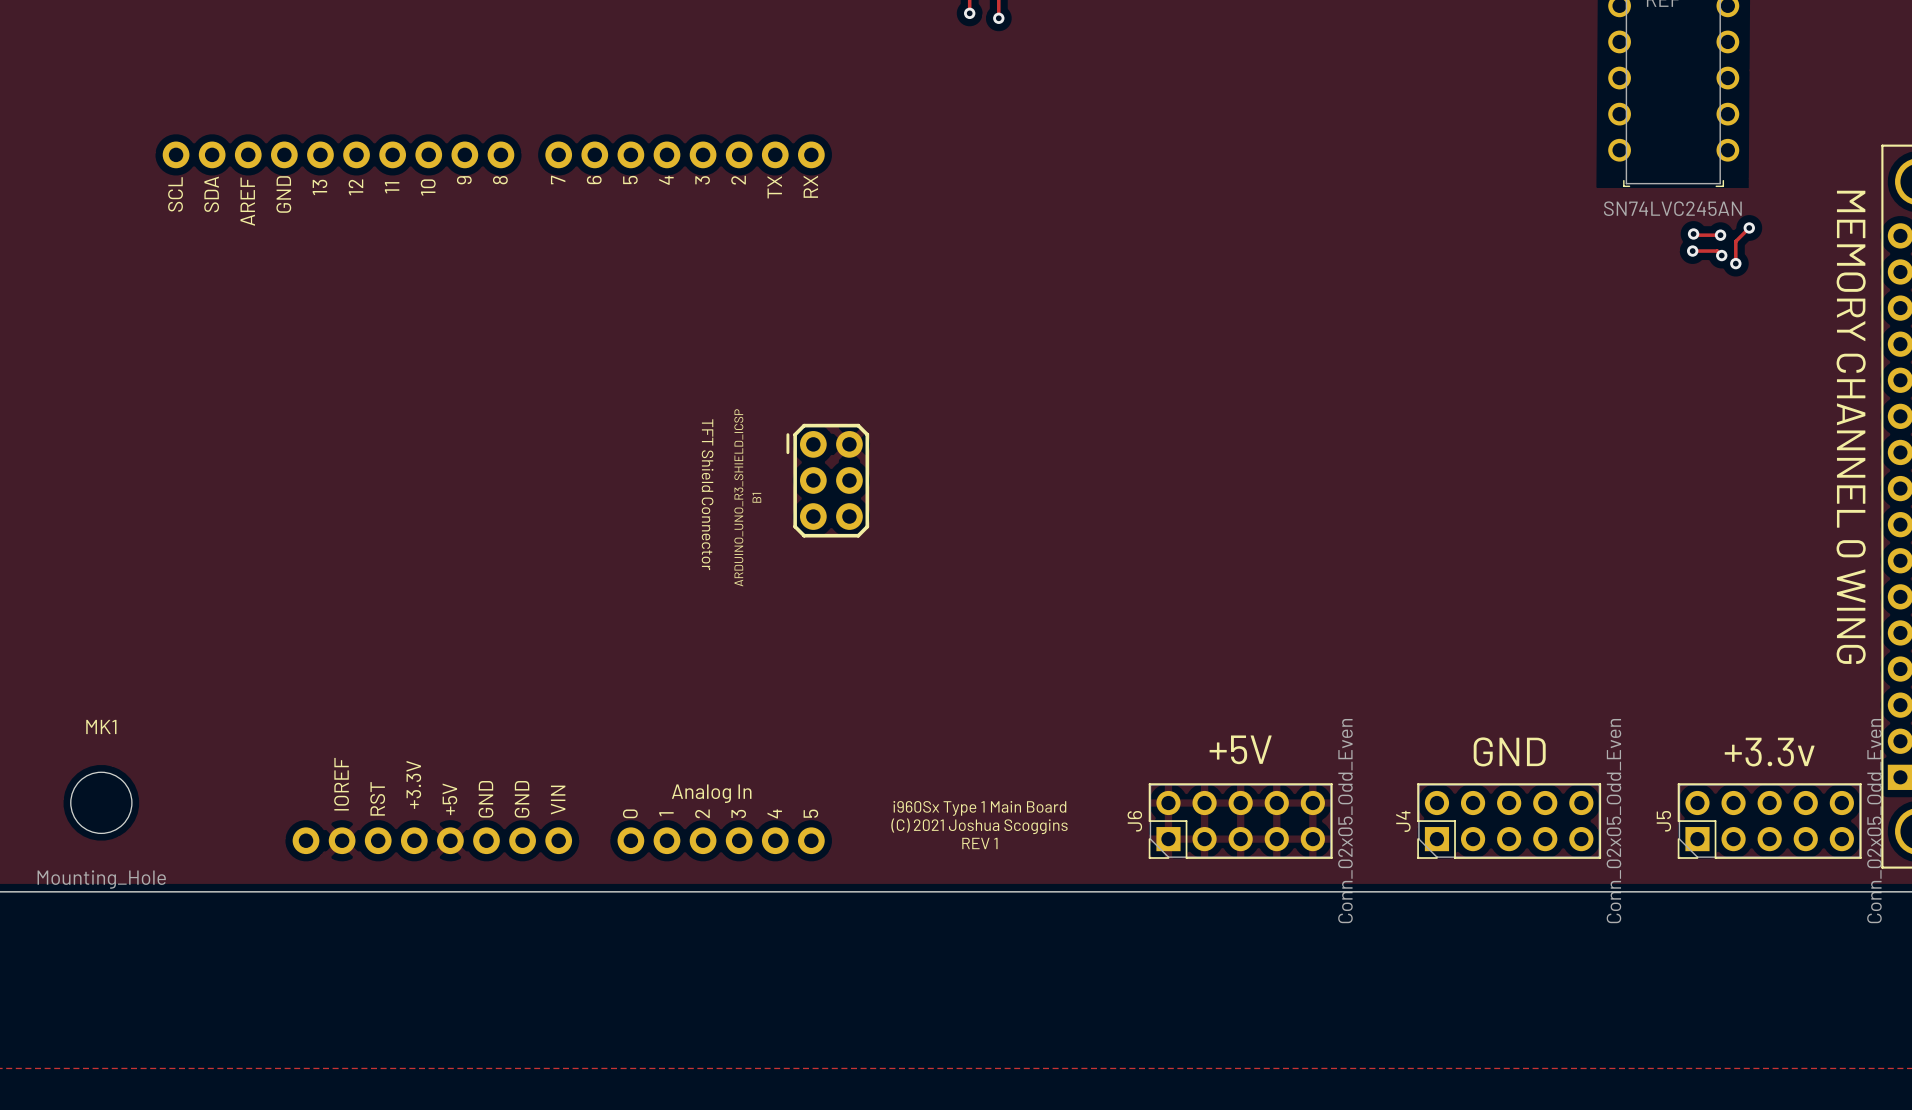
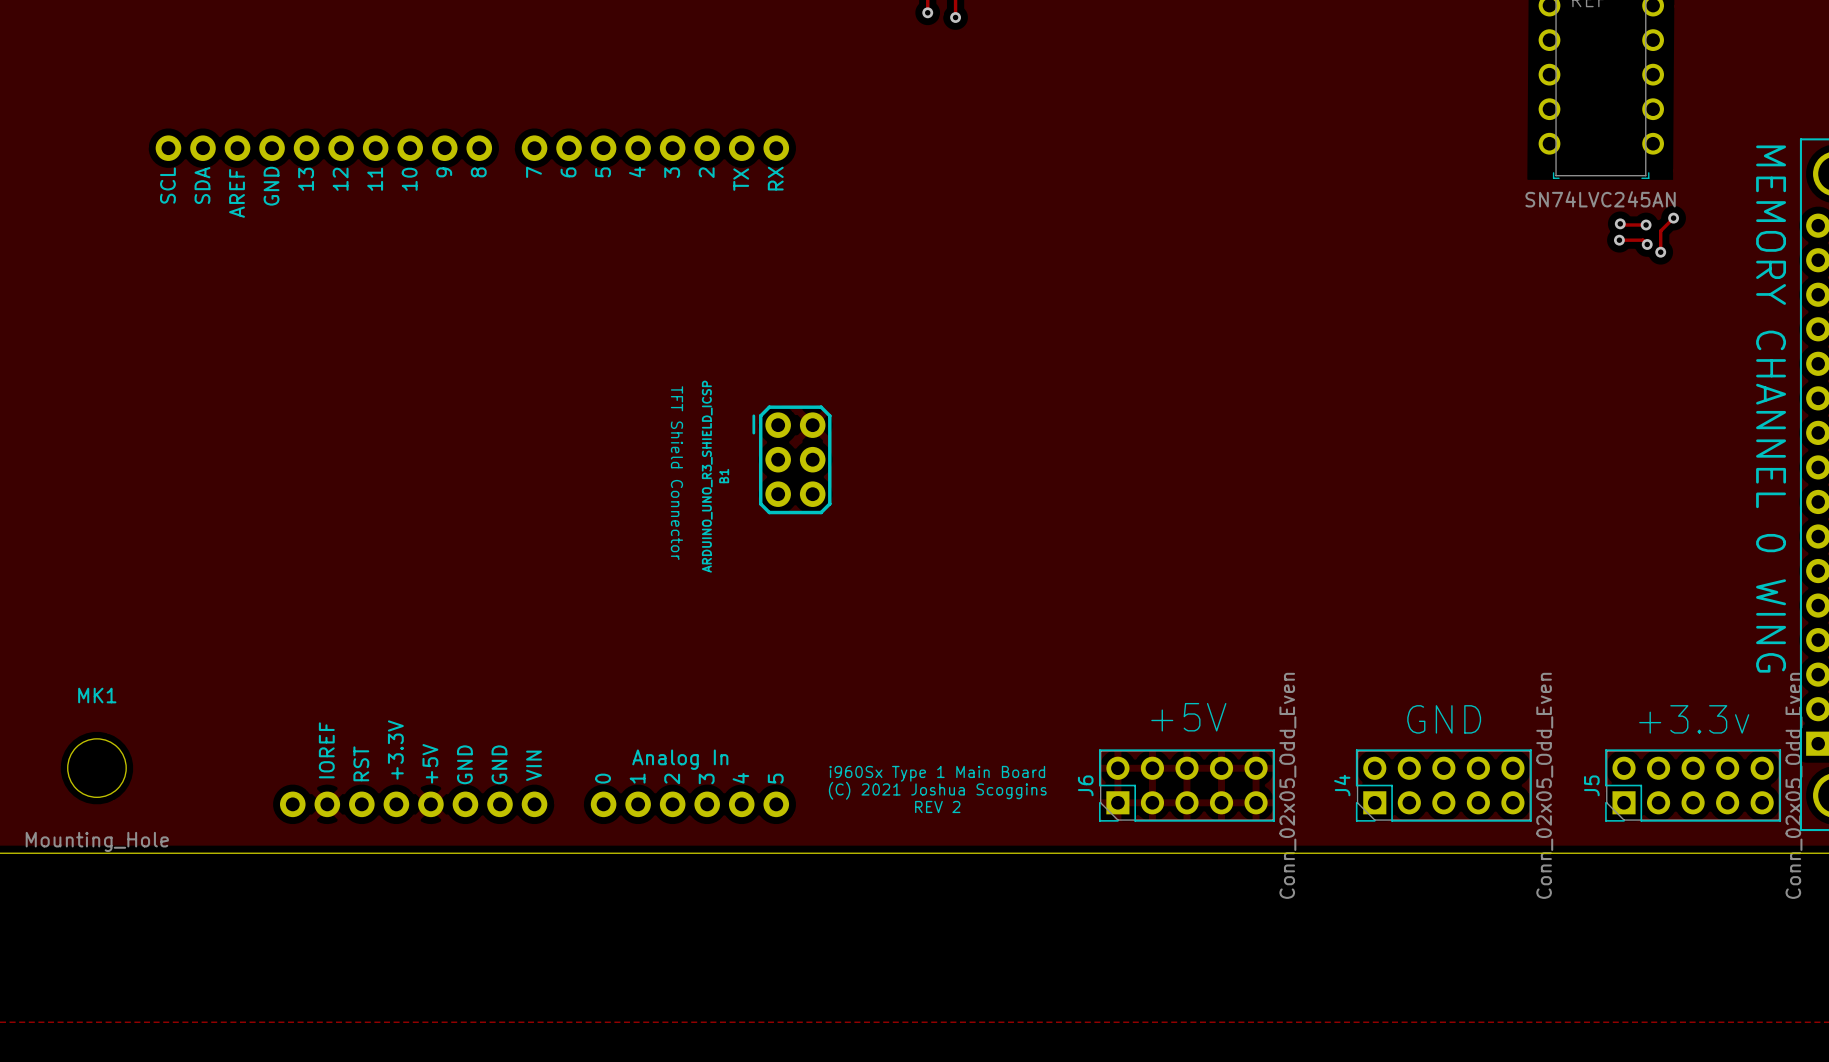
text: REV 1 (979, 843) -> REV 2 (937, 806)

